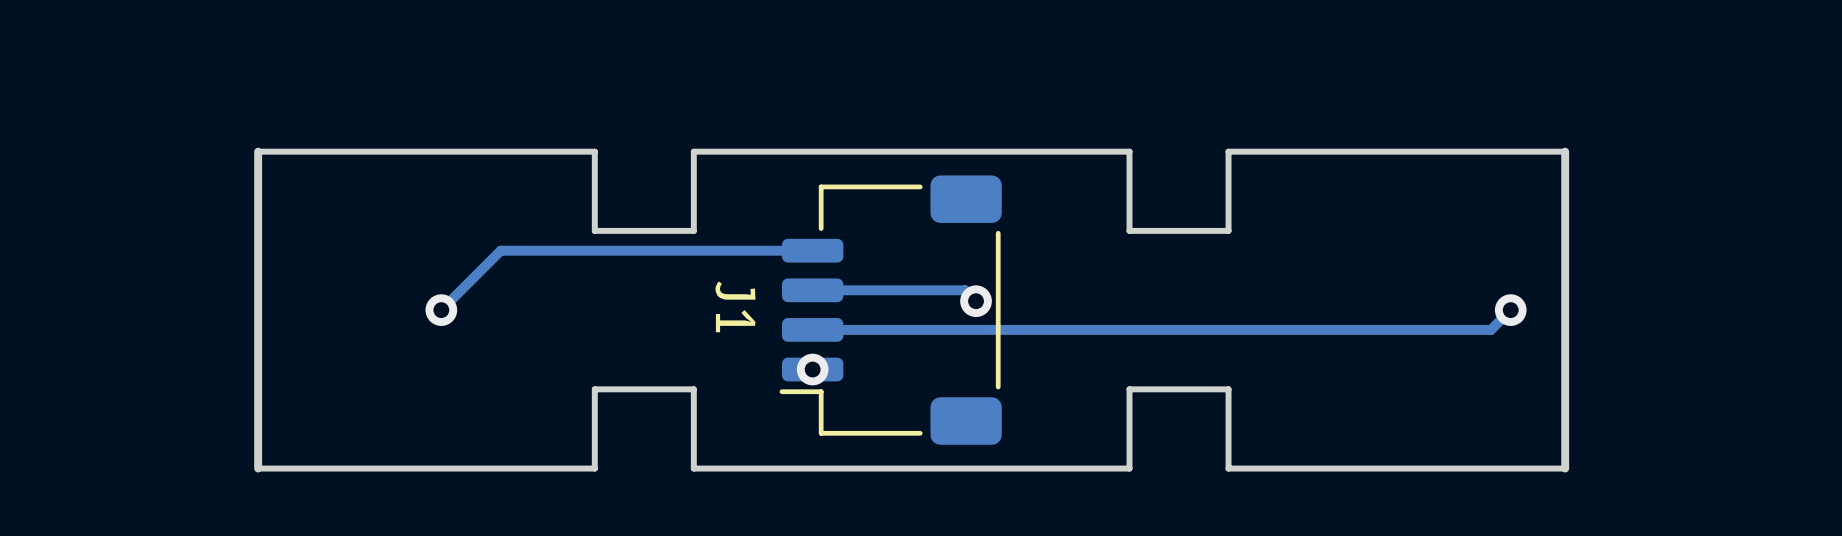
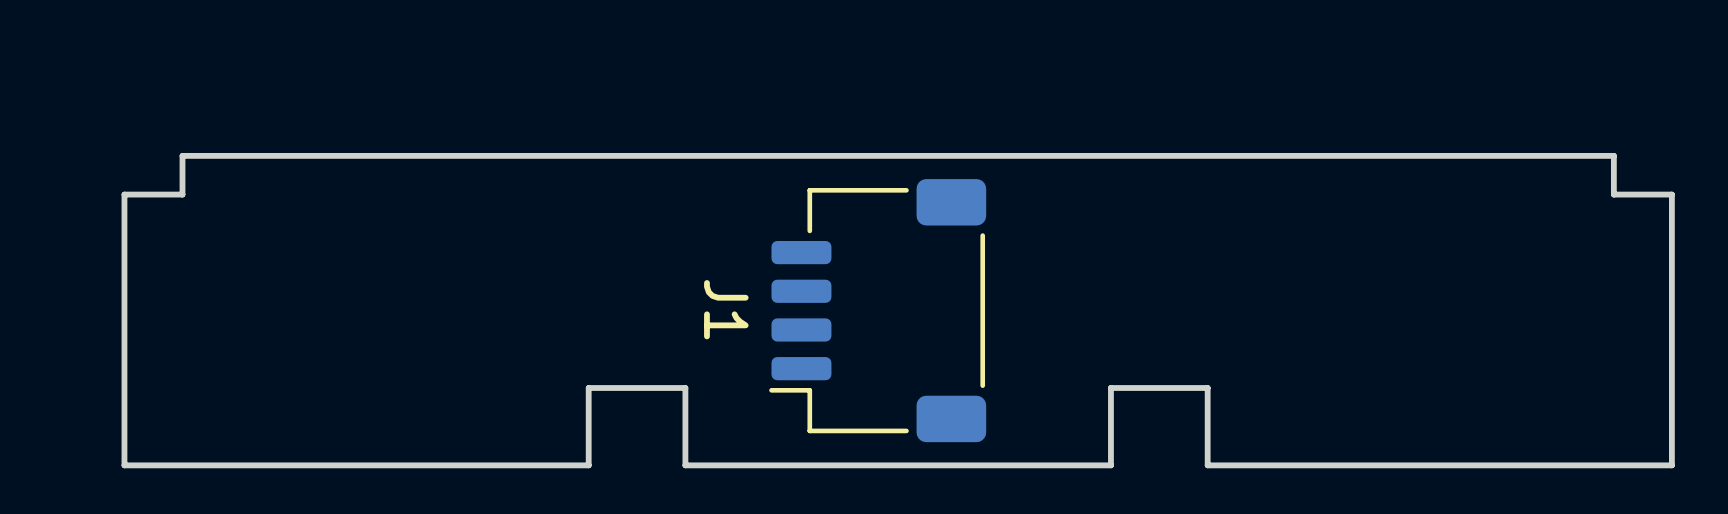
board edge: (258, 151) (258, 468) -> (259, 155) (182, 155) (182, 194) (124, 194) (124, 465) (259, 465)
board edge: (693, 151) (693, 230) (594, 230) (594, 151) -> (685, 155) (588, 155)
board edge: (1228, 151) (1228, 230) (1129, 230) (1129, 151) -> (1207, 155) (1110, 155)
board edge: (1565, 151) (1565, 468) -> (1536, 155) (1613, 155) (1613, 194) (1671, 194) (1671, 465) (1536, 465)
track: (812, 250) (500, 250) (441, 310) -> none
track: (812, 290) (965, 290) (976, 301) -> none
via: (976, 301) -> none
via: (441, 310) -> none
track: (1510, 310) (1490, 329) (812, 329) -> none
via: (1510, 310) -> none
via: (812, 369) -> none

